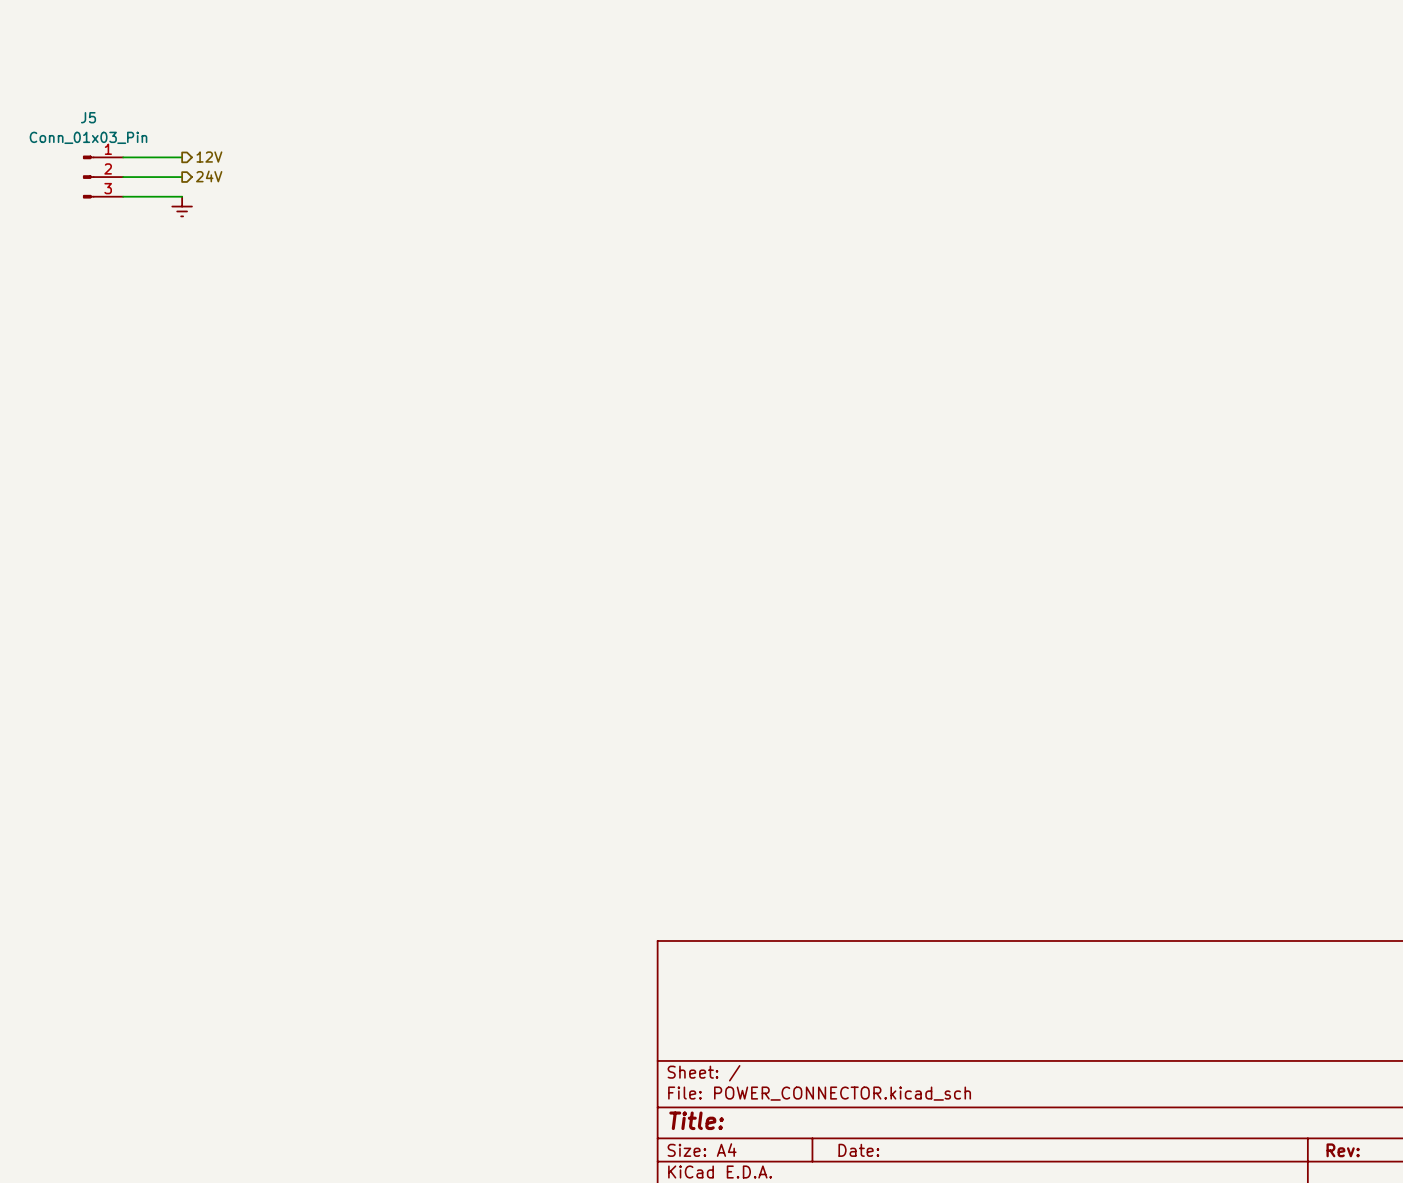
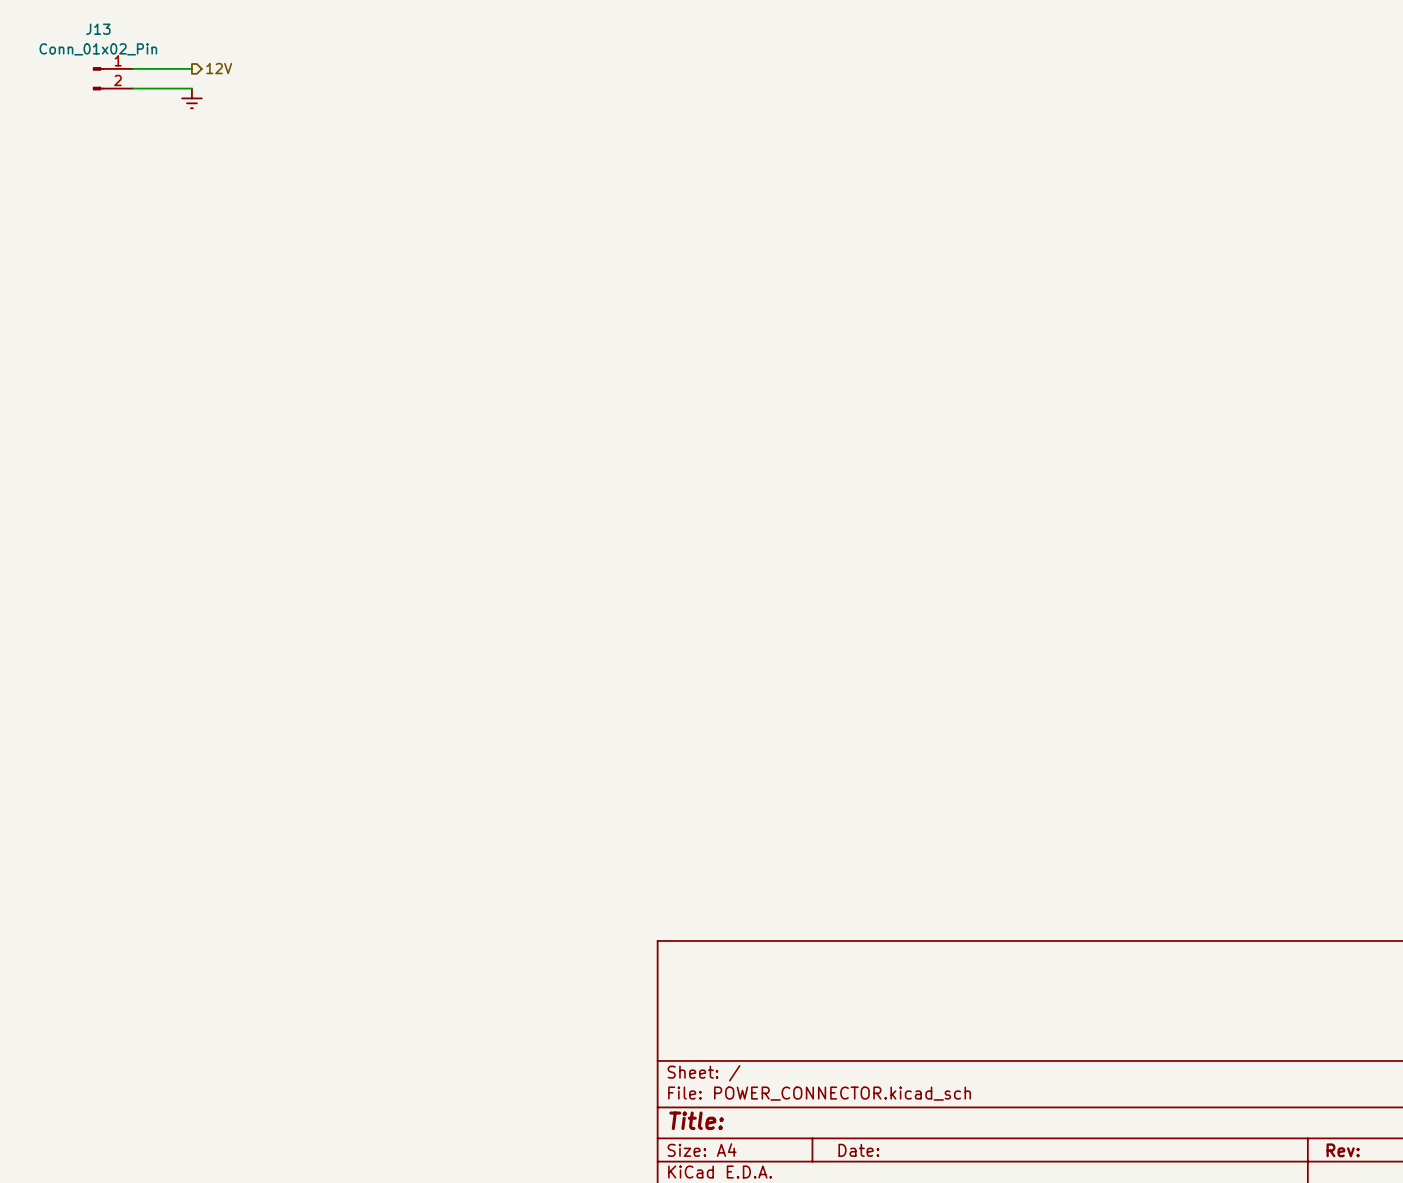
J13: none -> Conn_01x02_Pin (113, 78)
wire: (123, 157) (182, 157) -> (132, 68) (191, 68)
hierarchical label position: 12V (209, 157) -> 12V (219, 68)
hierarchical label: 24V (209, 176) -> none
J5: Conn_01x03_Pin (103, 177) -> none
wire: (123, 177) (182, 177) -> (132, 88) (191, 88)
wire: (123, 196) (182, 196) -> none
power symbol position: (182, 206) -> (191, 98)

